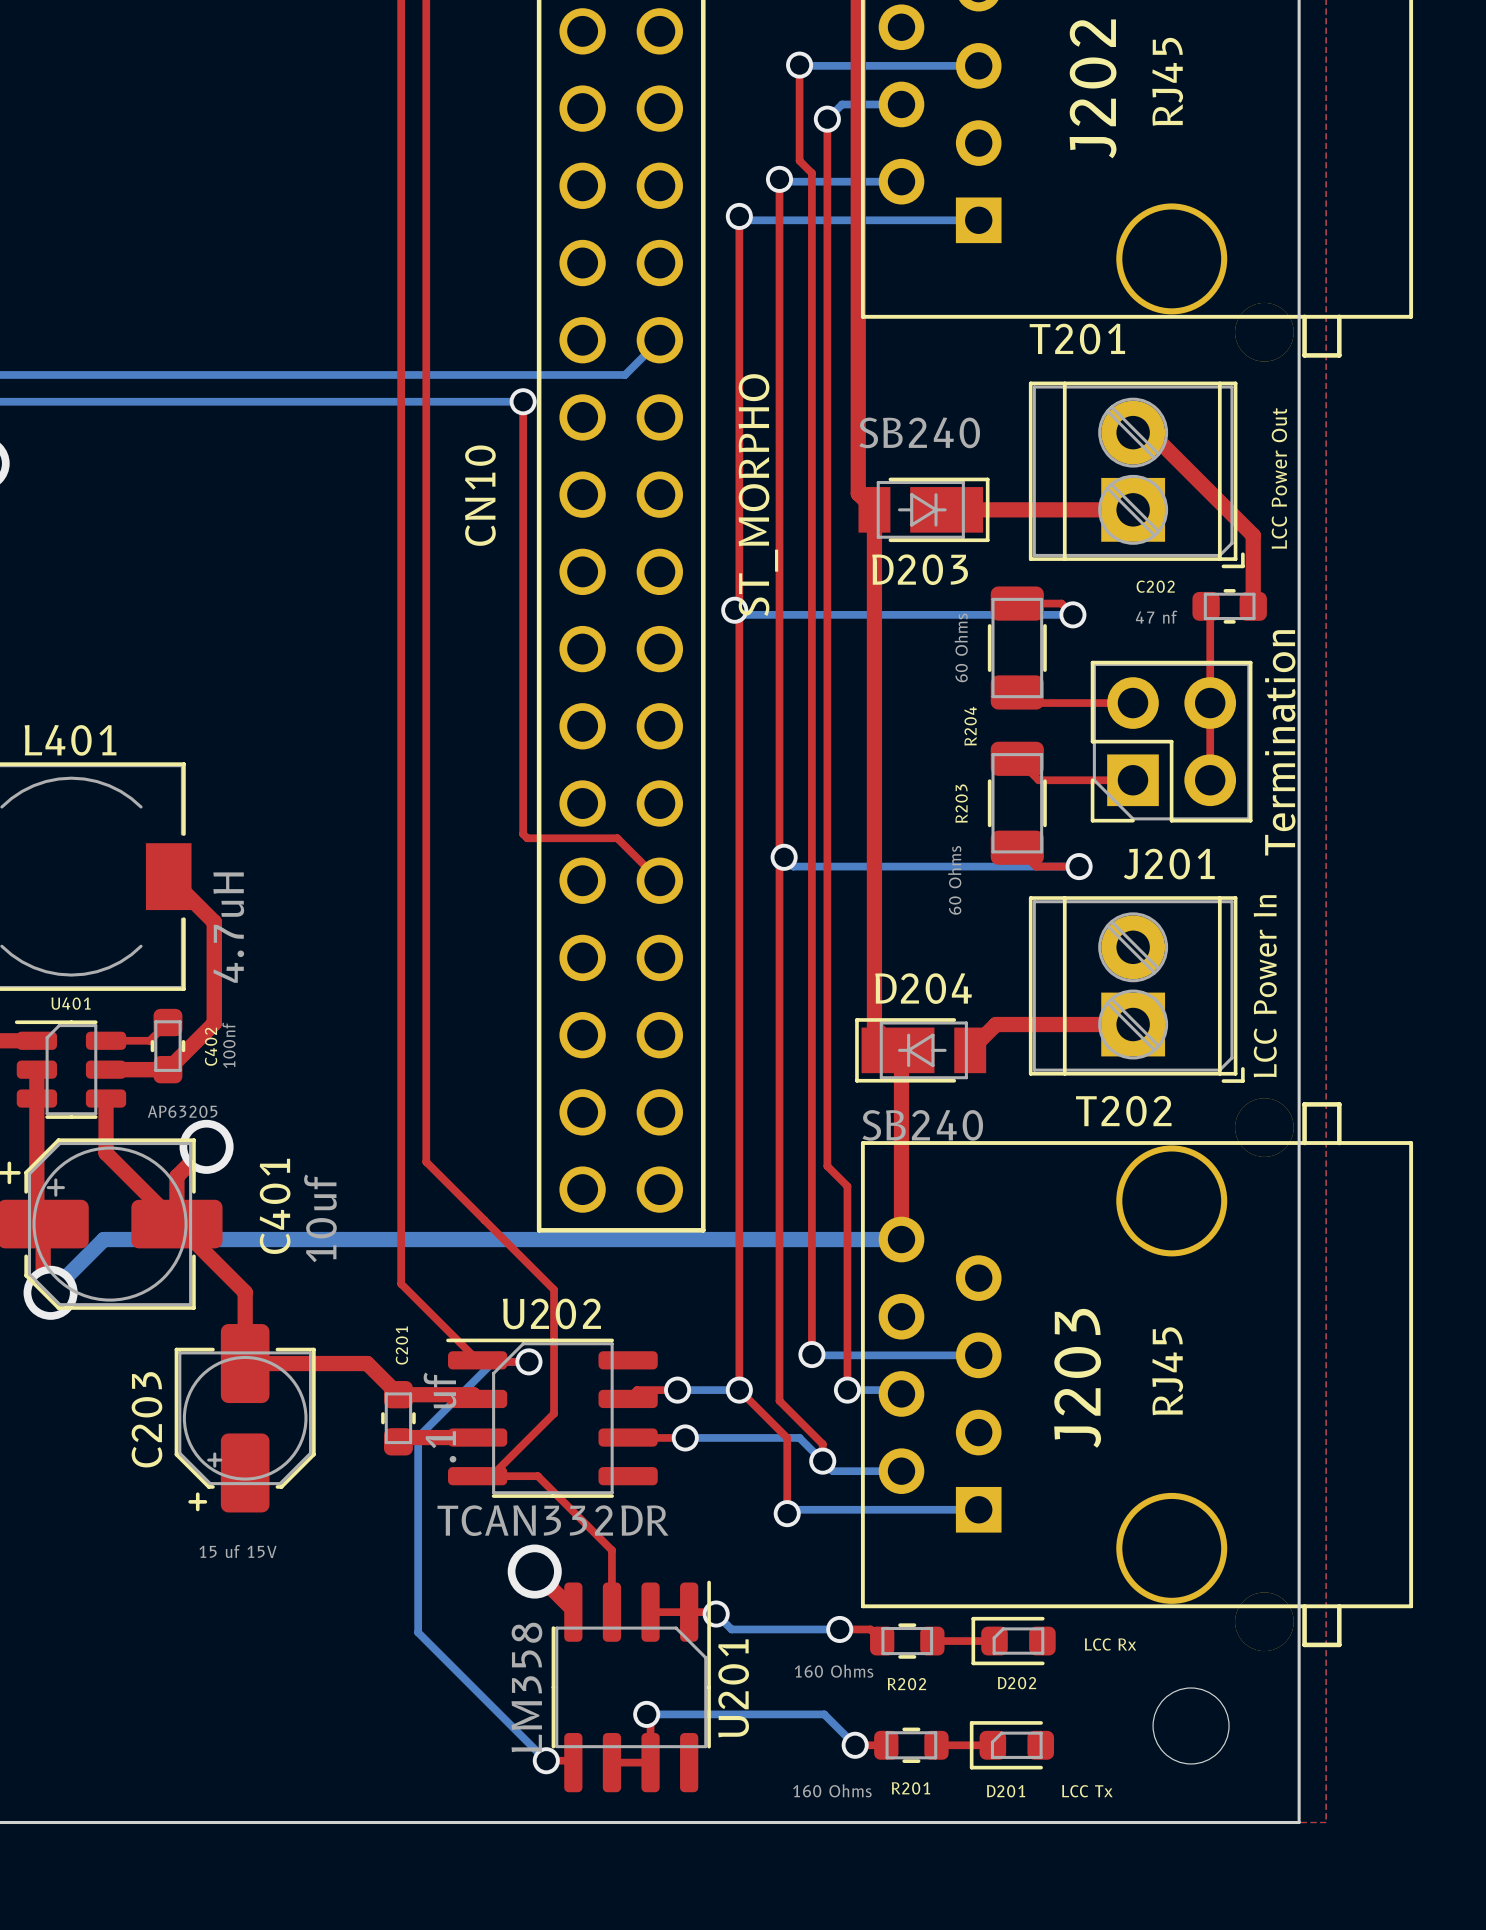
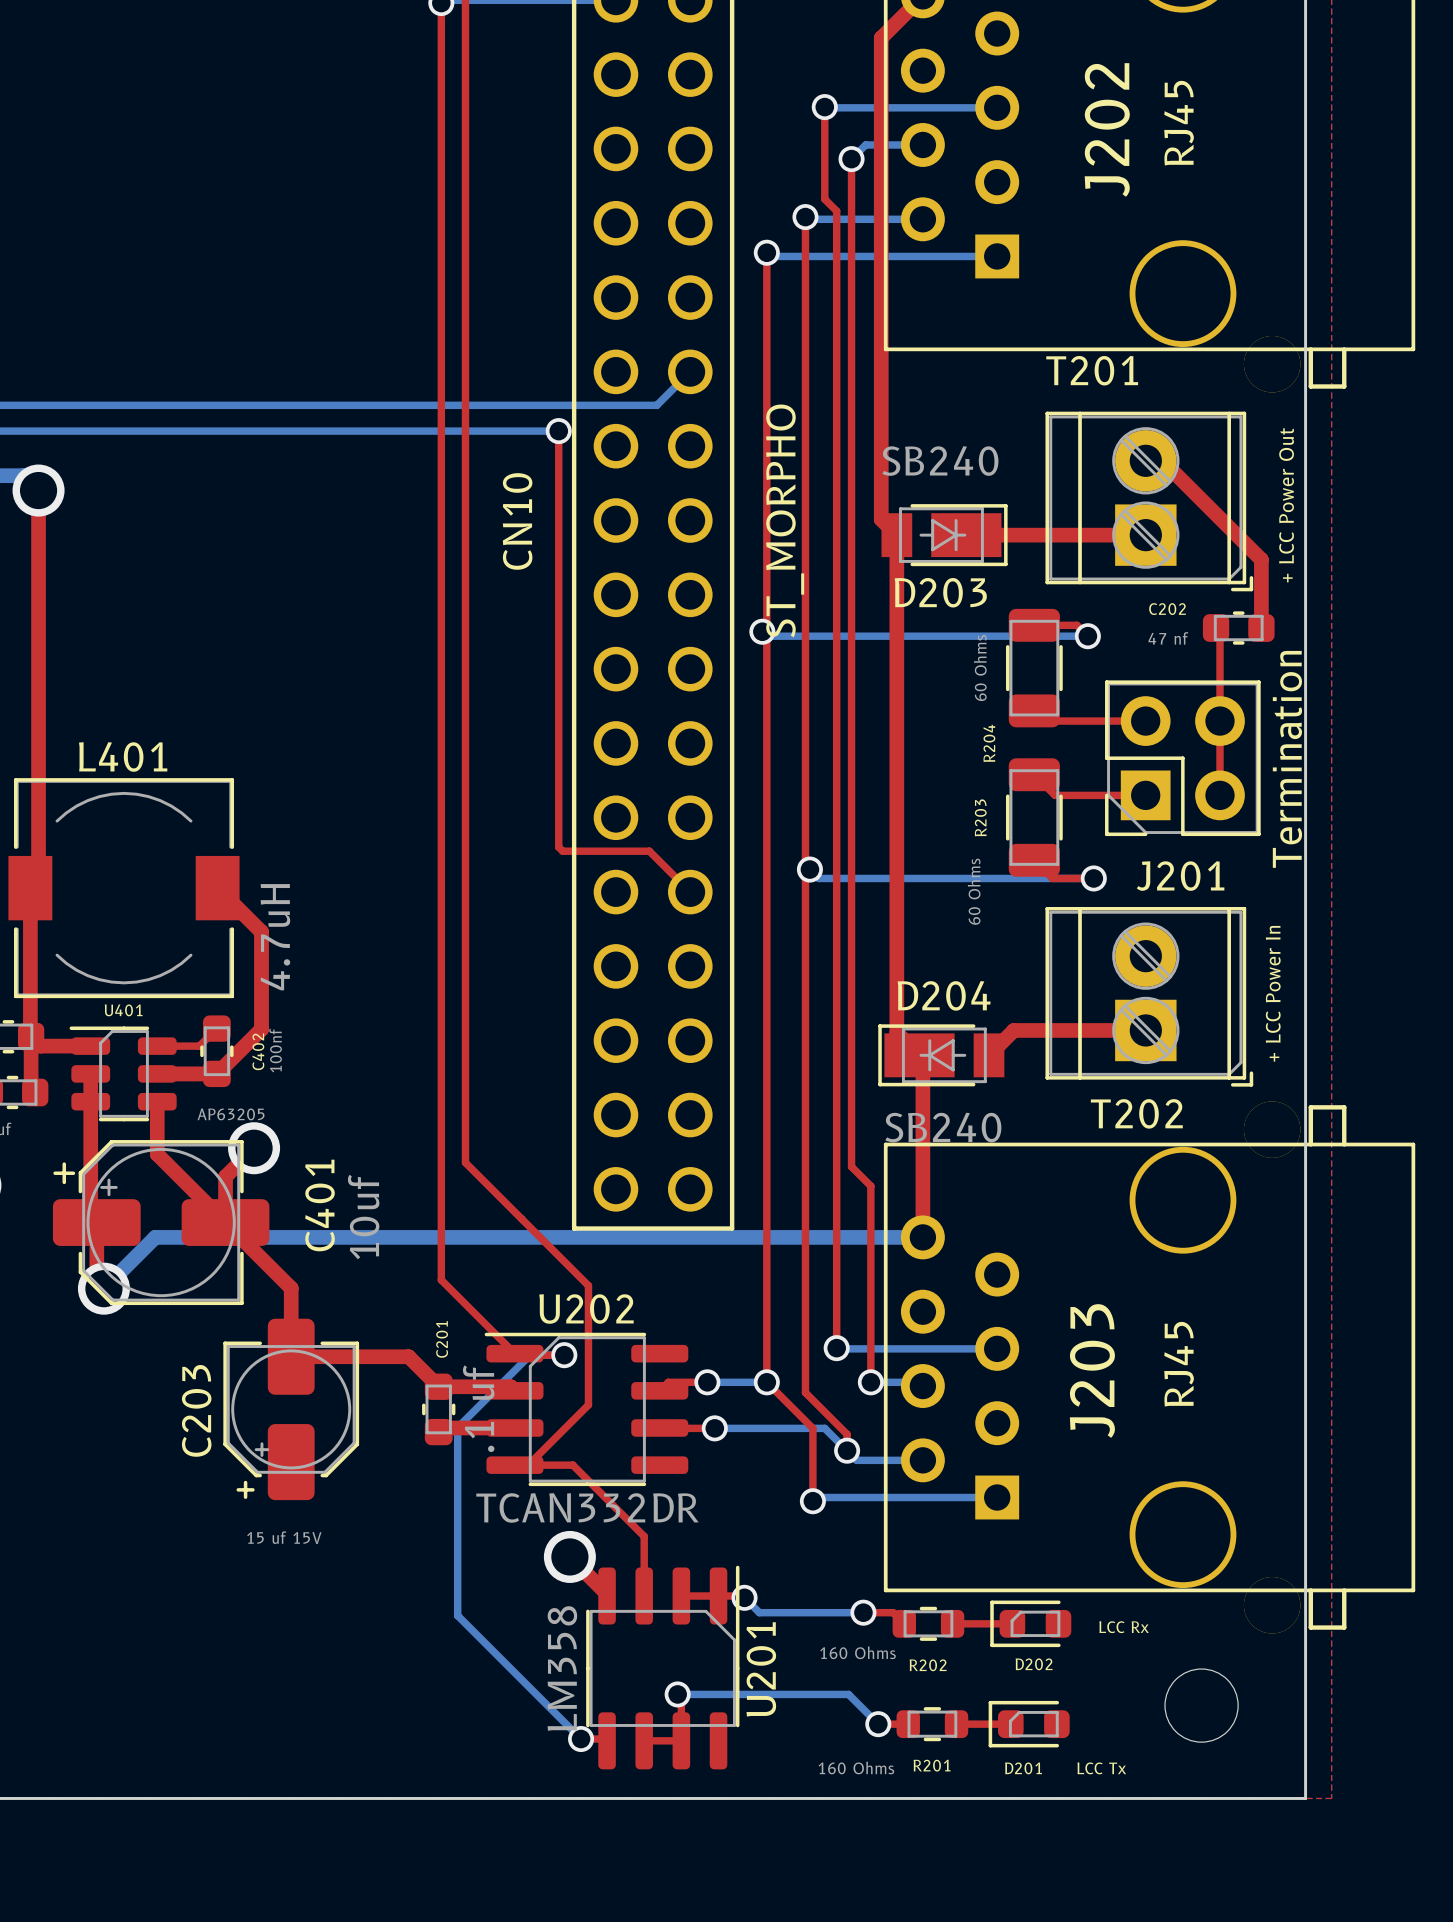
T201 value: LCC Power Out (1279, 478) -> + LCC Power Out (1286, 505)
T202 value: LCC Power In (1265, 986) -> + LCC Power In (1273, 993)

